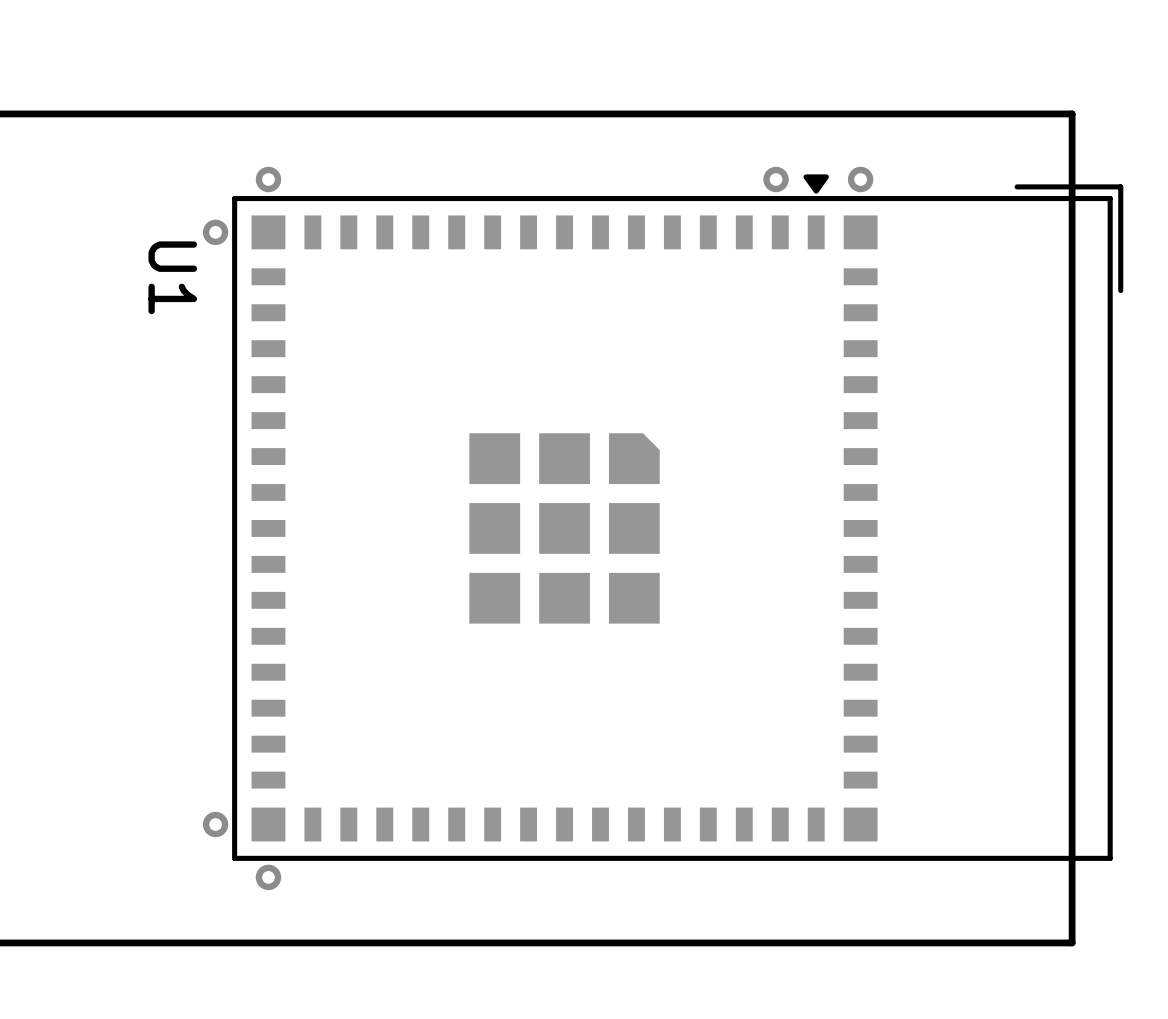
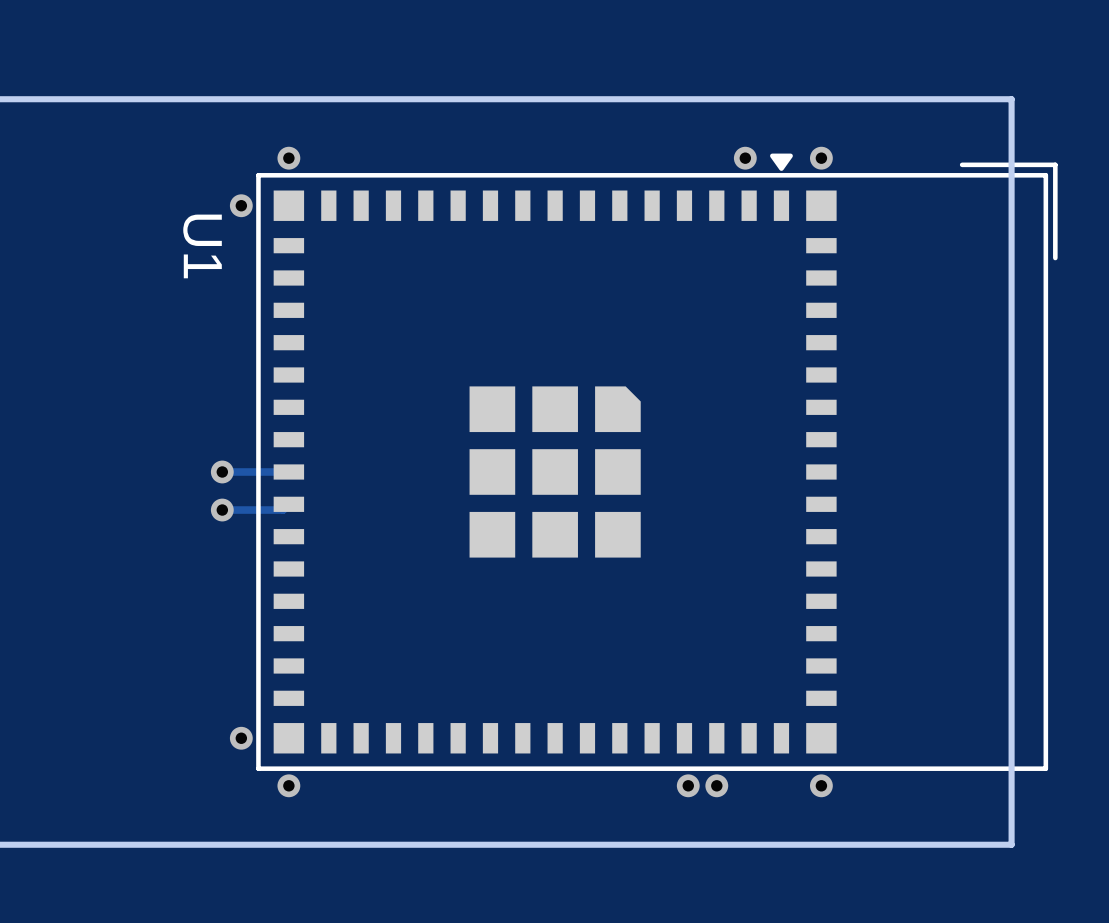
track: none -> (222, 471) (288, 471)
via: none -> (222, 471)
track: none -> (288, 504) (283, 510) (222, 510)
via: none -> (222, 510)
via: none -> (688, 785)
via: none -> (716, 785)
via: none -> (821, 785)

